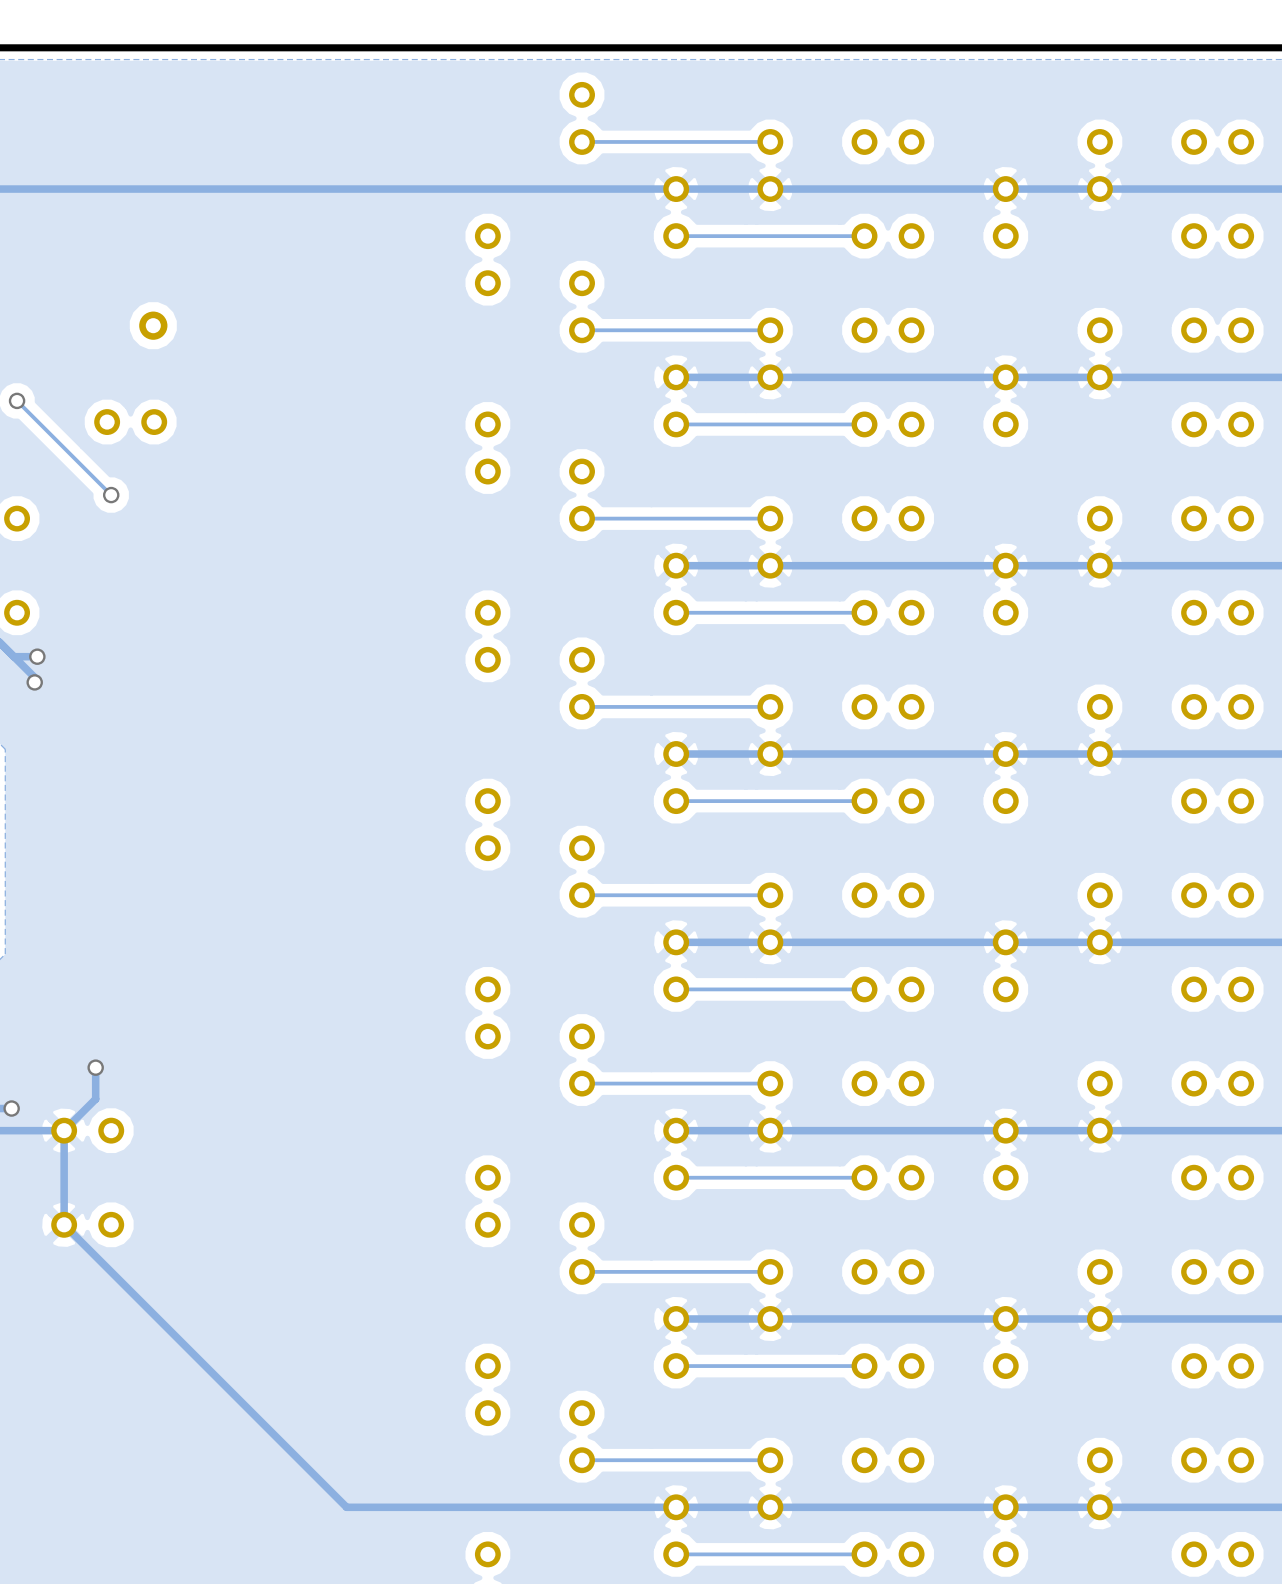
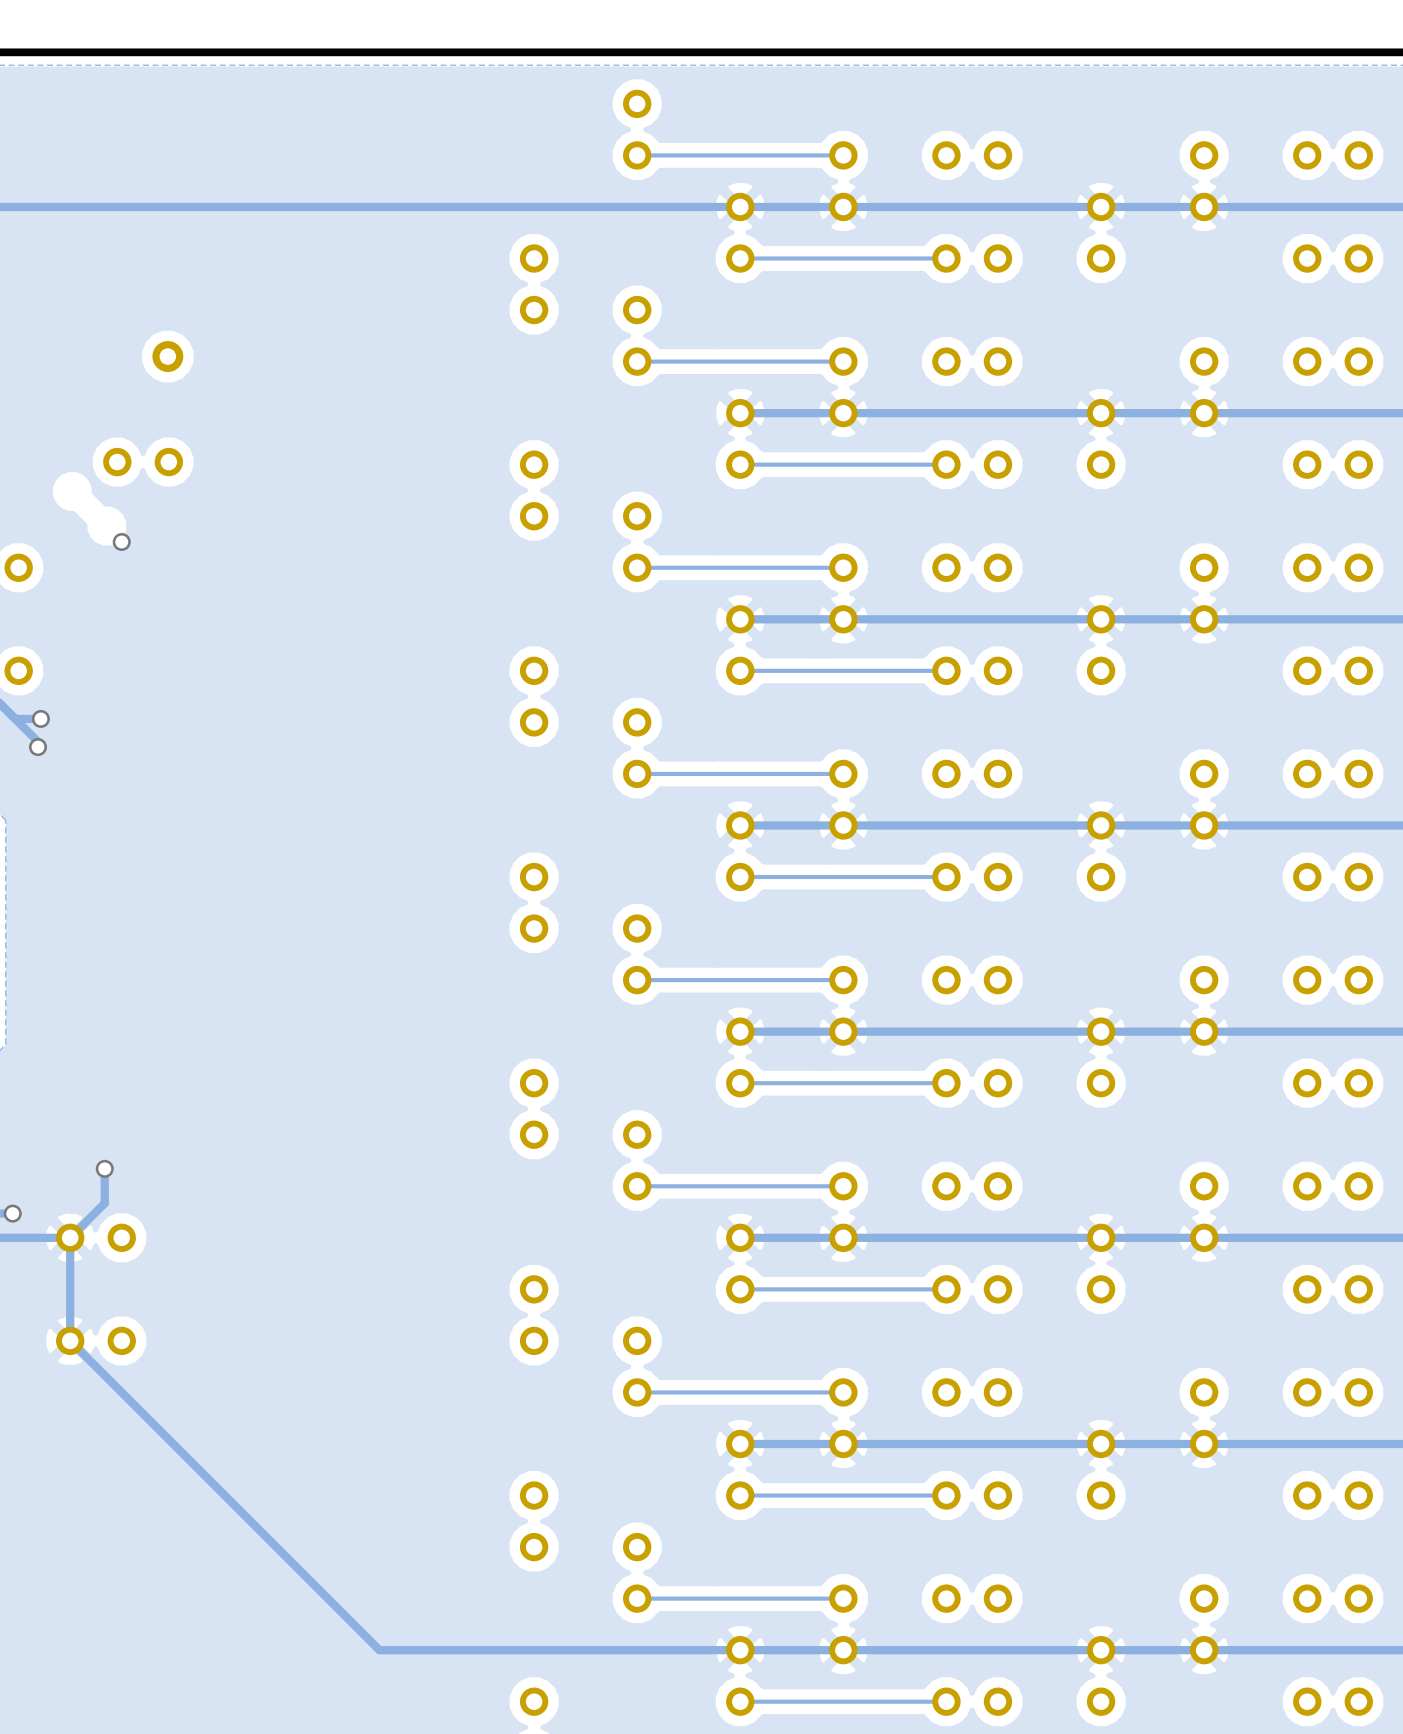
track: (17, 400) (111, 495) -> none
via: (17, 400) -> none

